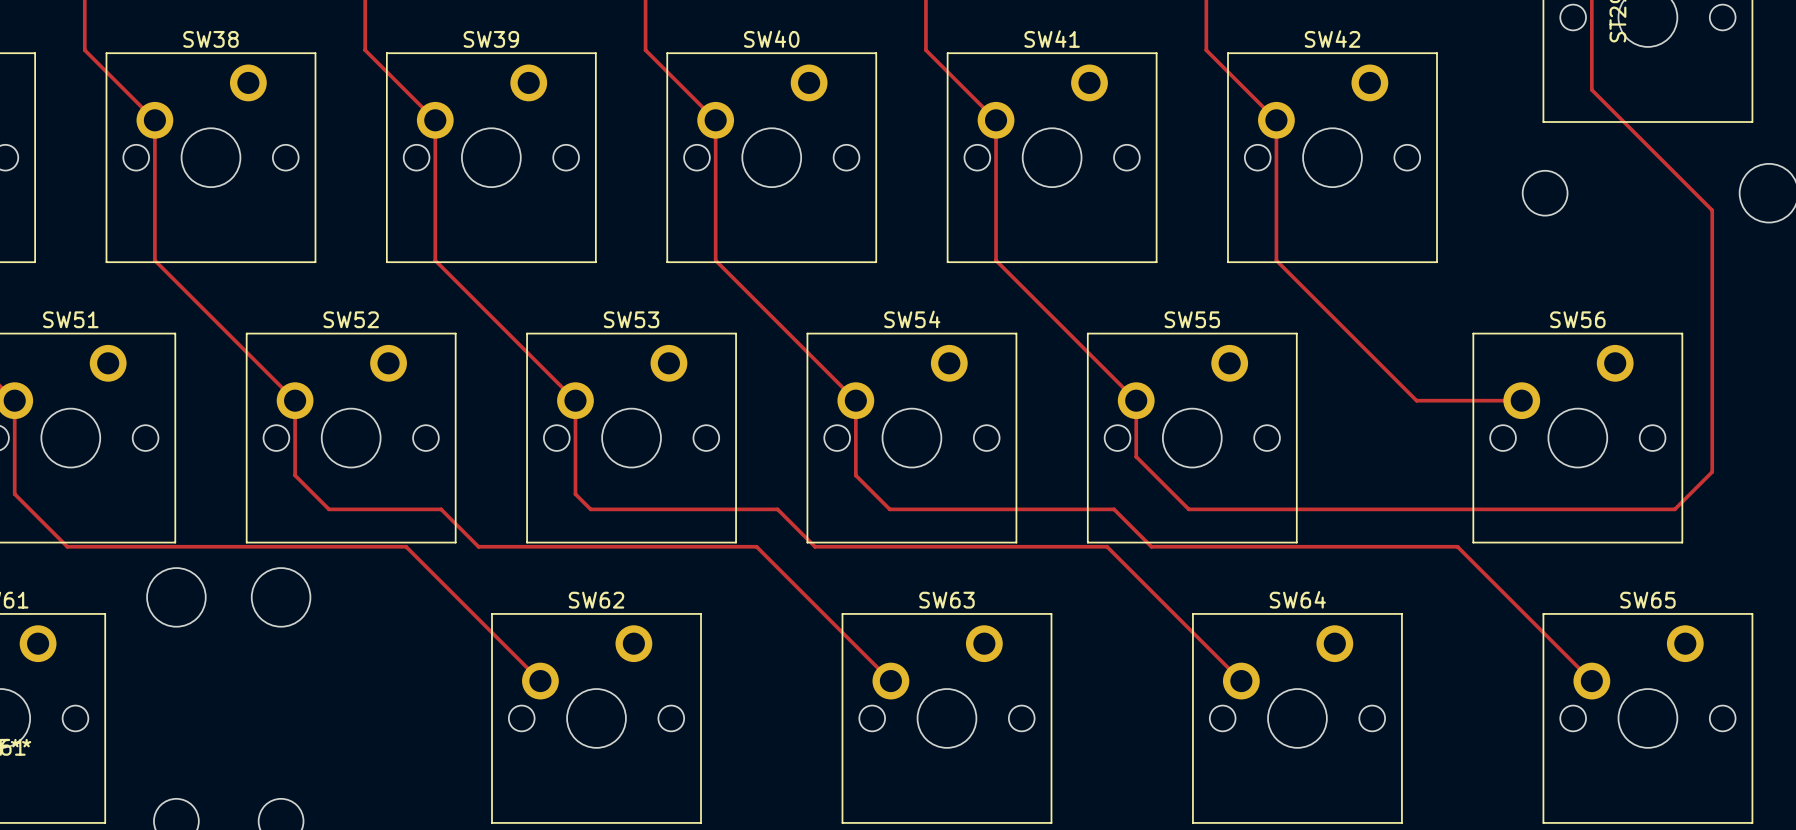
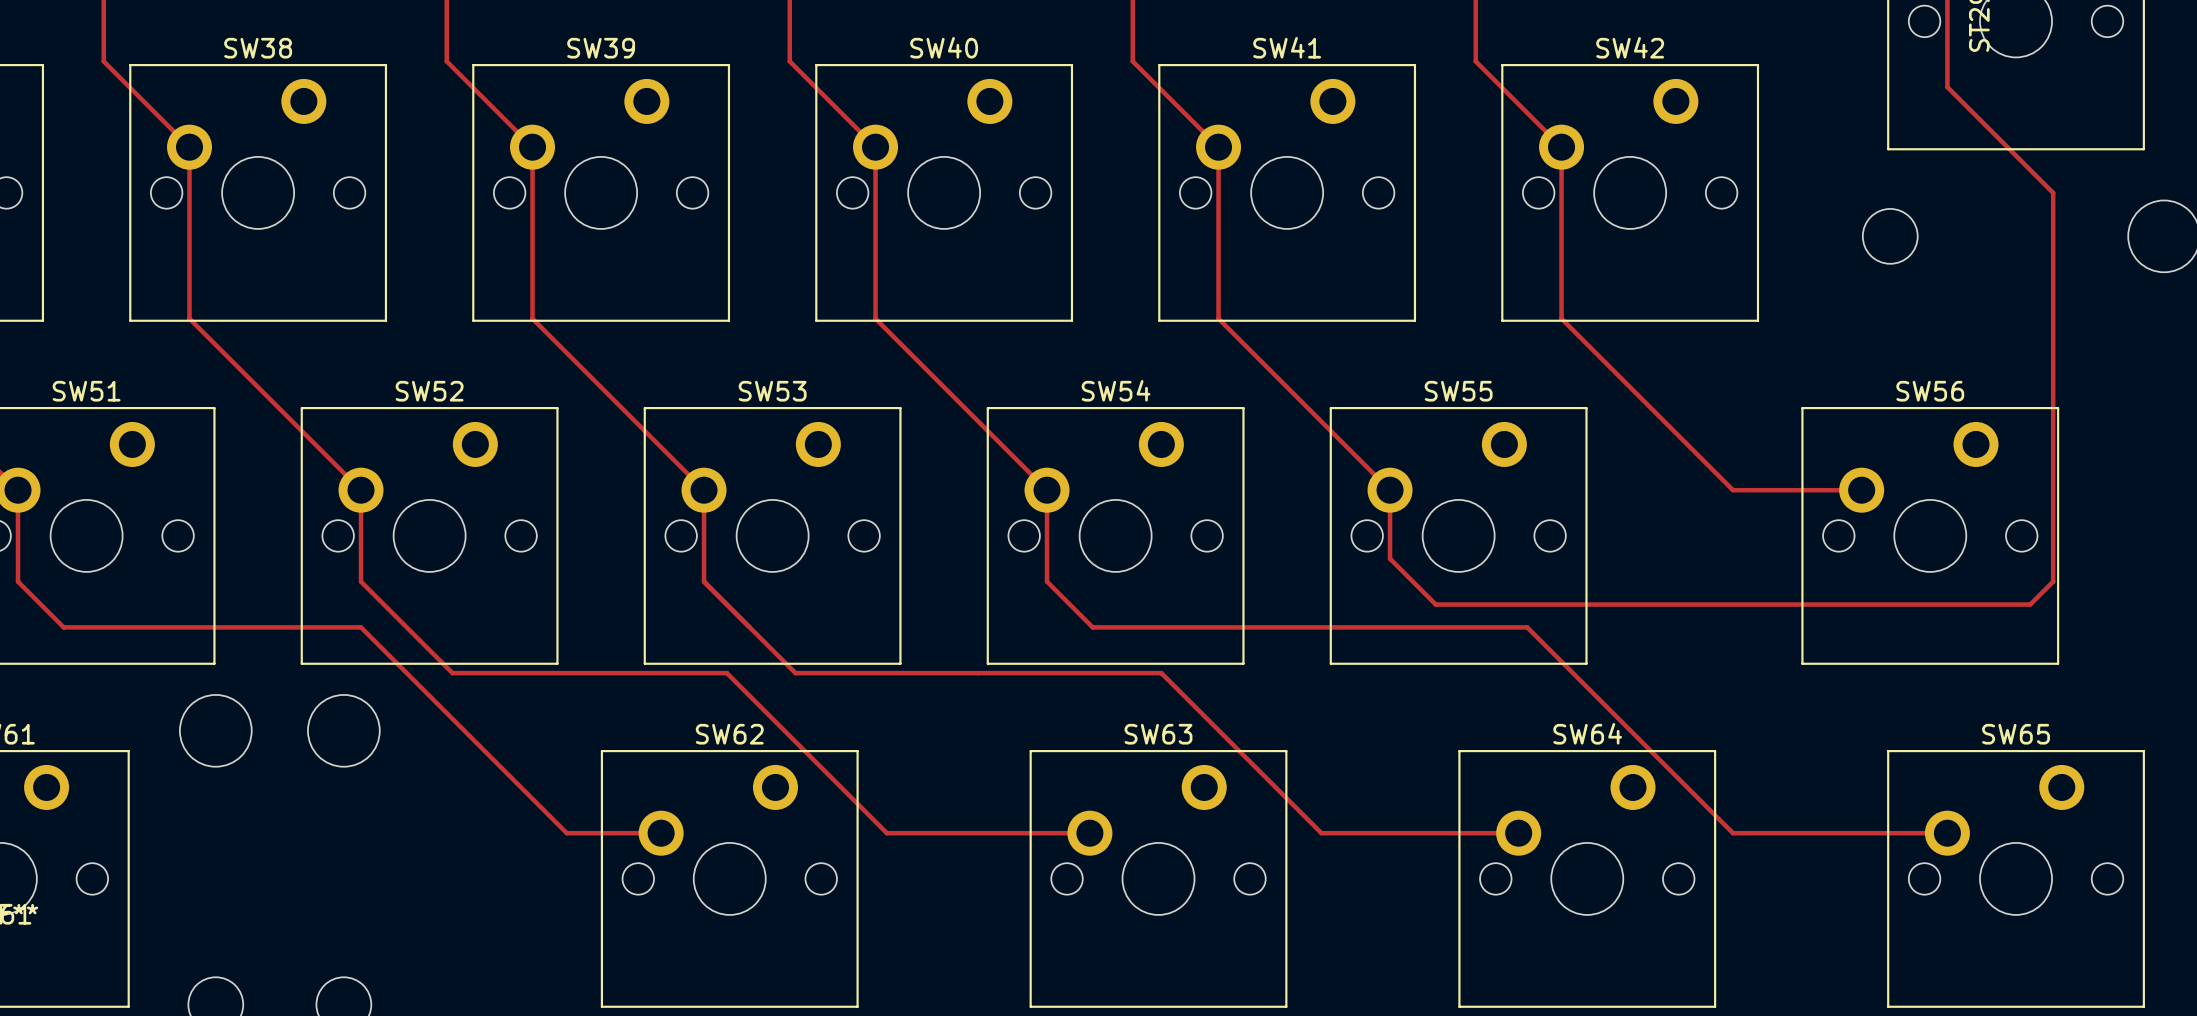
track: (1591, 71) (1591, 89) (1712, 210) (1712, 471) (1674, 509) (1188, 509) (1173, 494) -> (1947, 87) (2053, 192) (2053, 581) (2030, 604) (1435, 604)
track: (14, 475) (14, 494) (67, 546) (406, 546) (540, 681) -> (18, 581) (63, 627) (361, 627) (566, 833) (661, 833)
track: (575, 475) (575, 494) (590, 509) (777, 509) (815, 546) (1107, 546) (1241, 681) -> (704, 581) (795, 673) (1161, 673) (1321, 833) (1518, 833)
track: (329, 509) (441, 509) (478, 546) (756, 546) (890, 681) -> (402, 623) (452, 673) (726, 673) (886, 833) (1089, 833)
track: (889, 509) (1114, 509) (1151, 546) (1457, 546) (1591, 681) -> (1088, 623) (1092, 627) (1527, 627) (1733, 833) (1947, 833)

